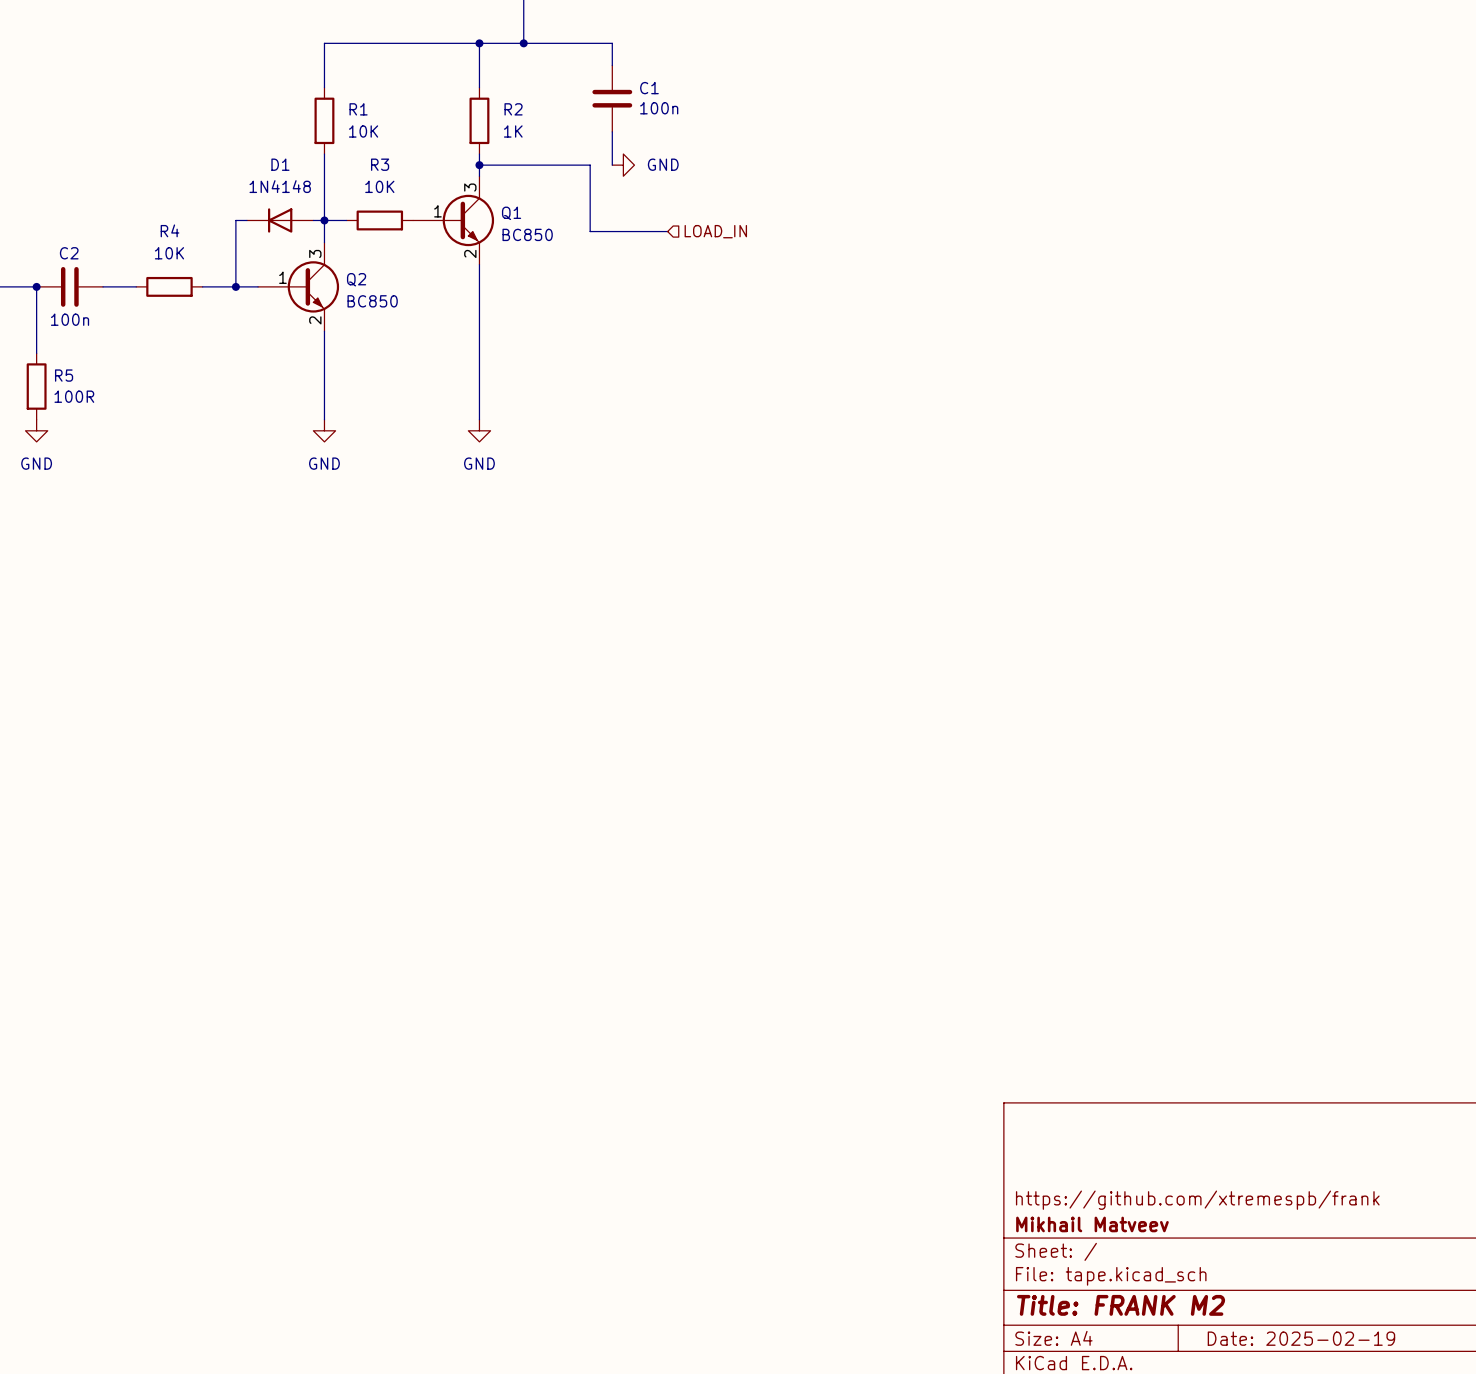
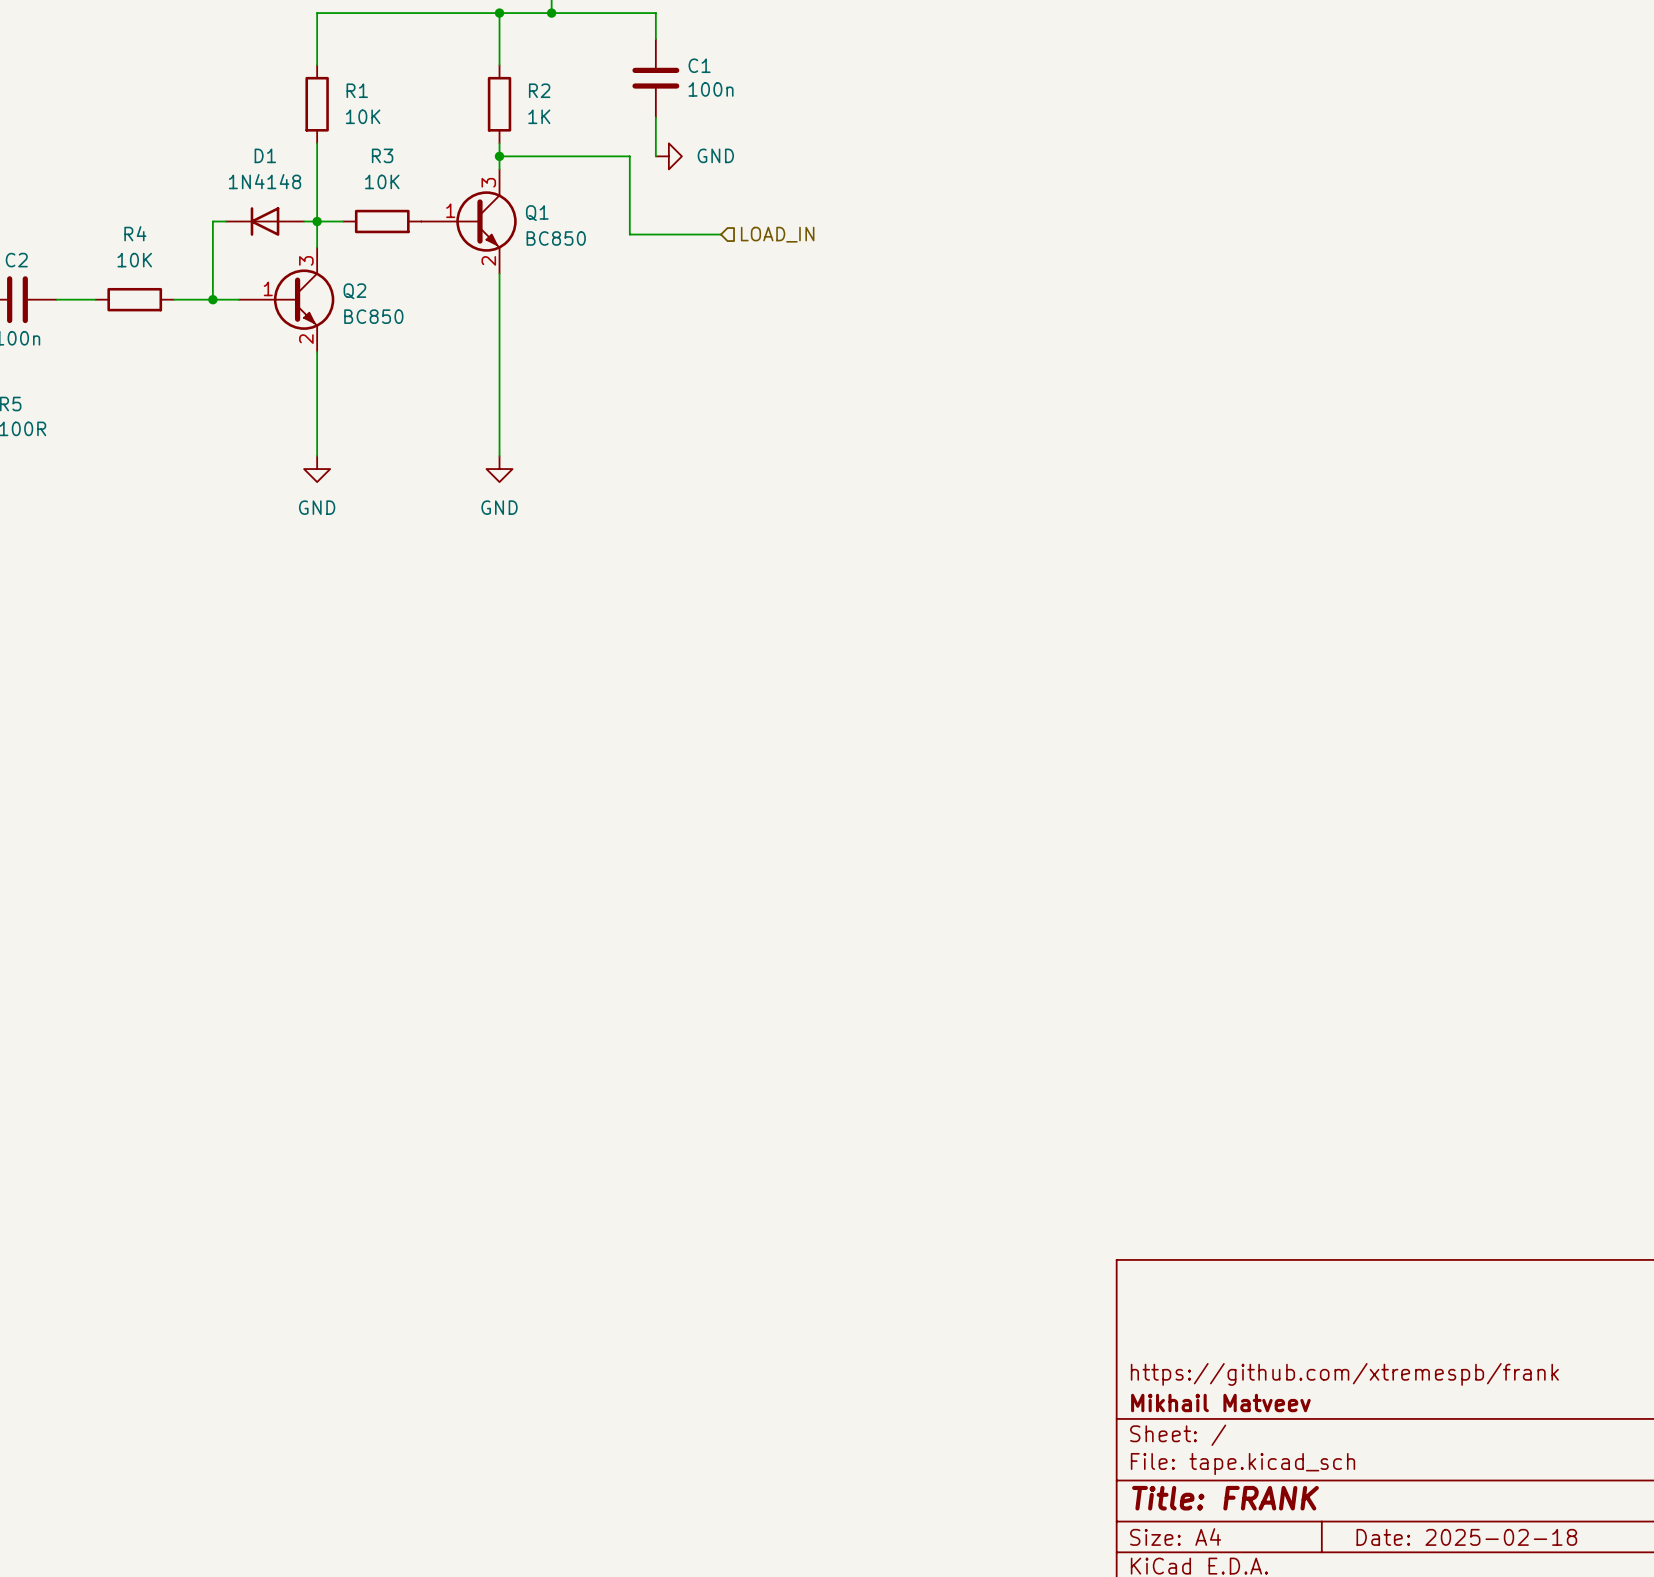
title block: Title: FRANK M2 (1121, 1305) -> Title: FRANK (1225, 1498)
title block: Date: 2025-02-19 (1301, 1338) -> Date: 2025-02-18 (1466, 1537)

